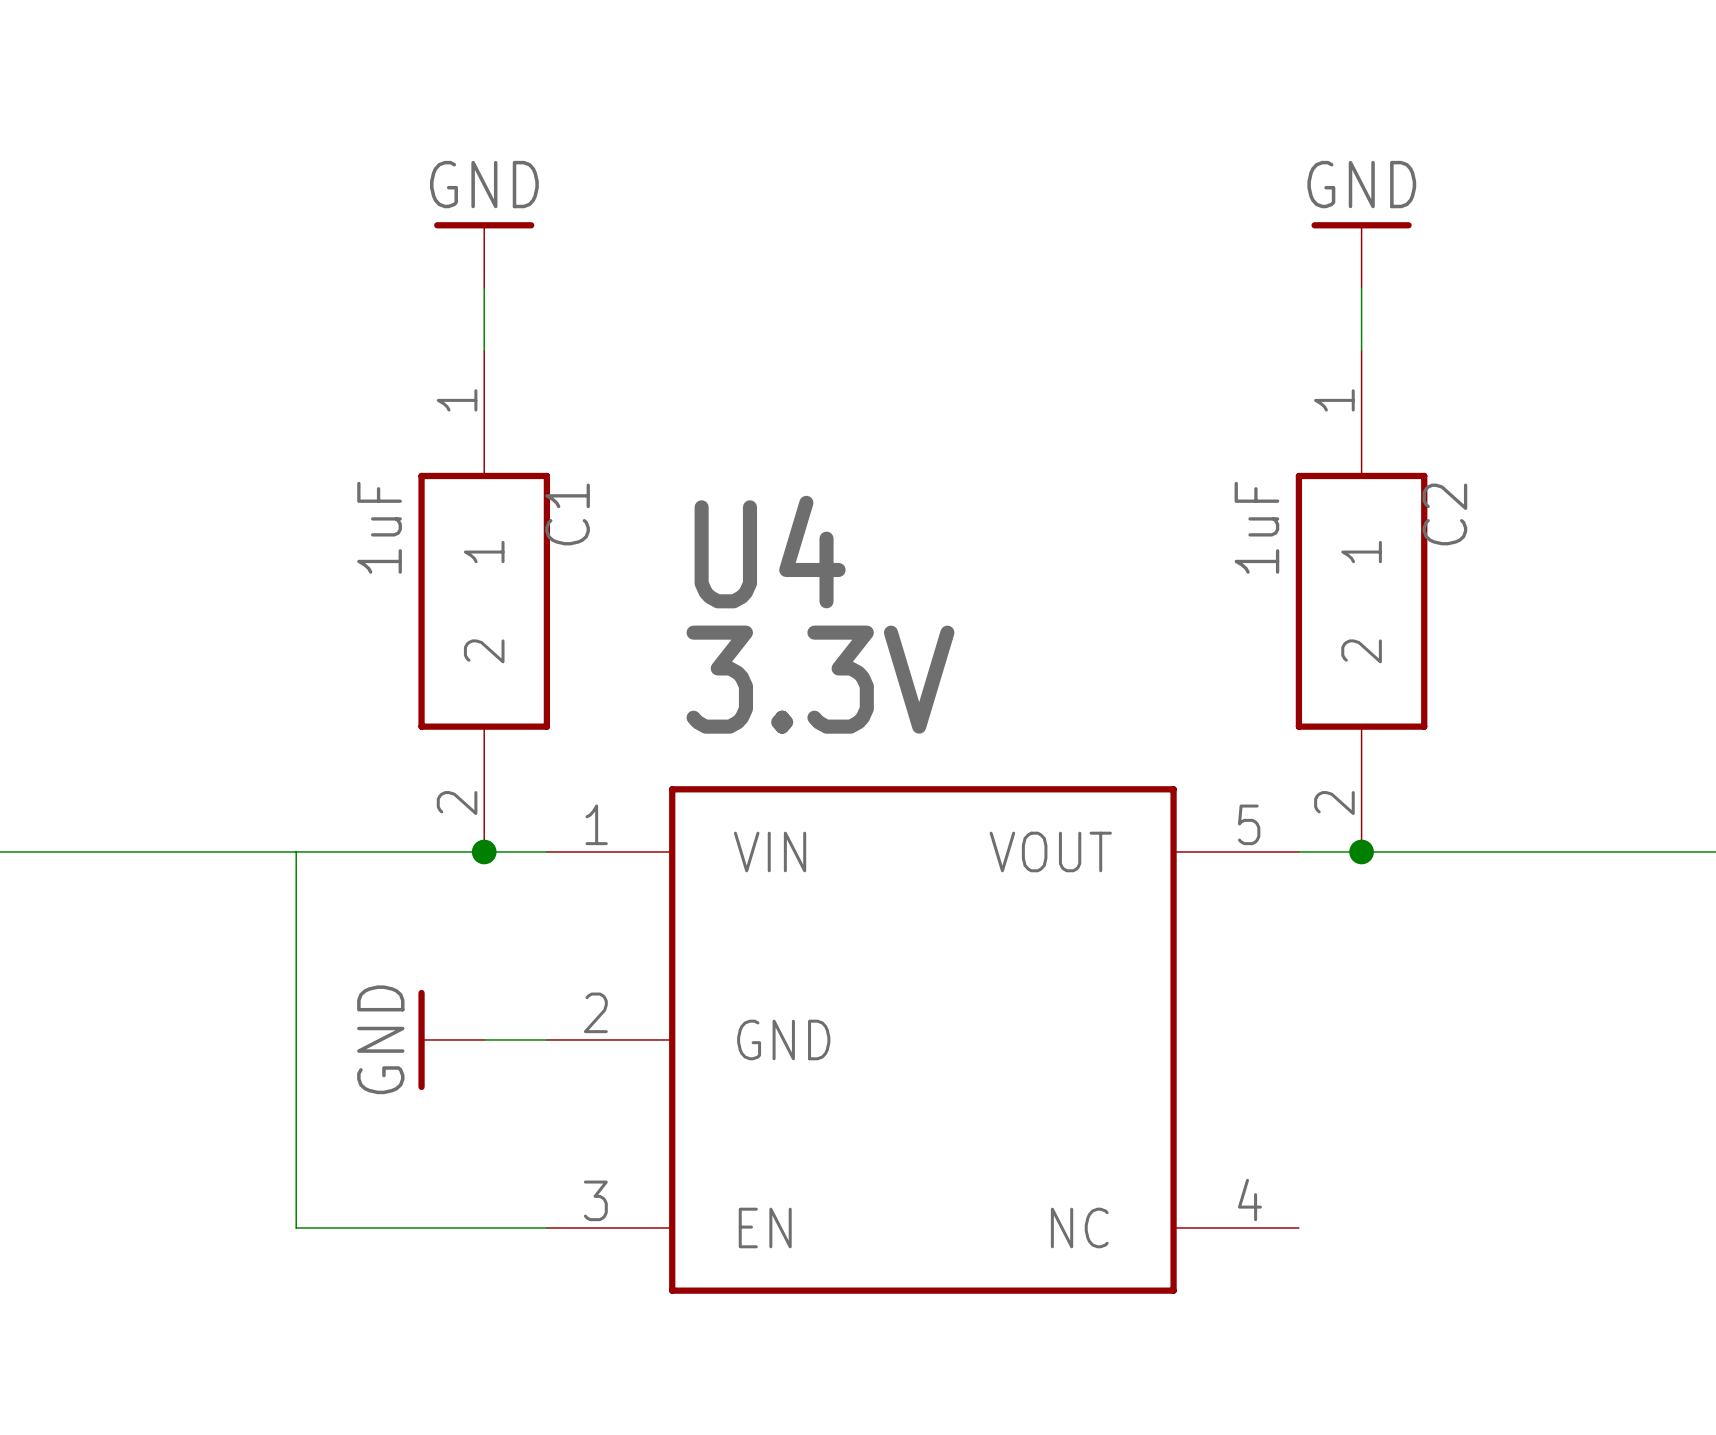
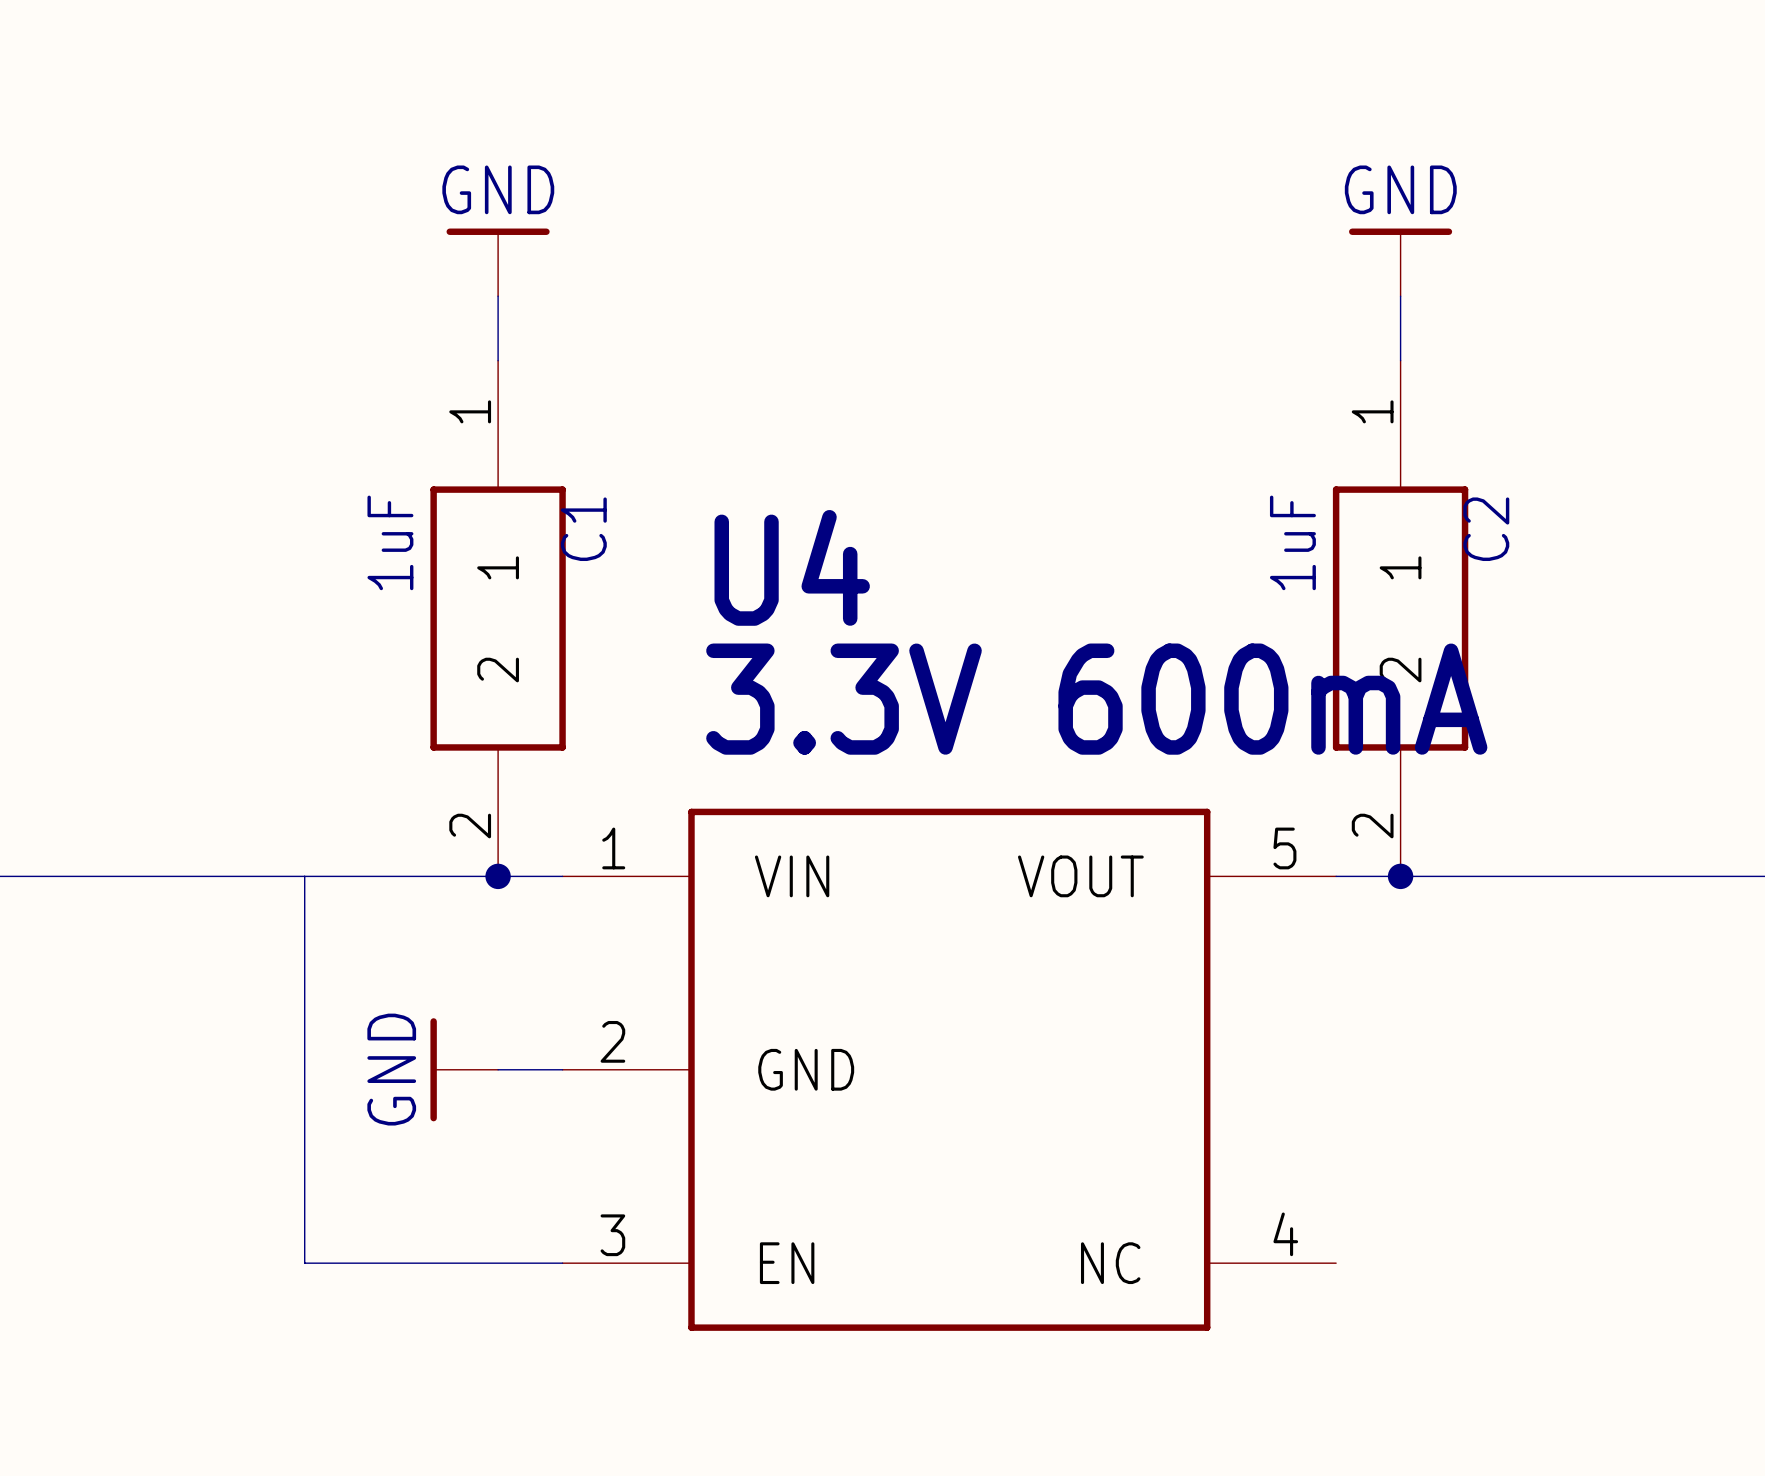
U4 value: 3.3V (820, 679) -> 3.3V 600mA (1096, 699)

